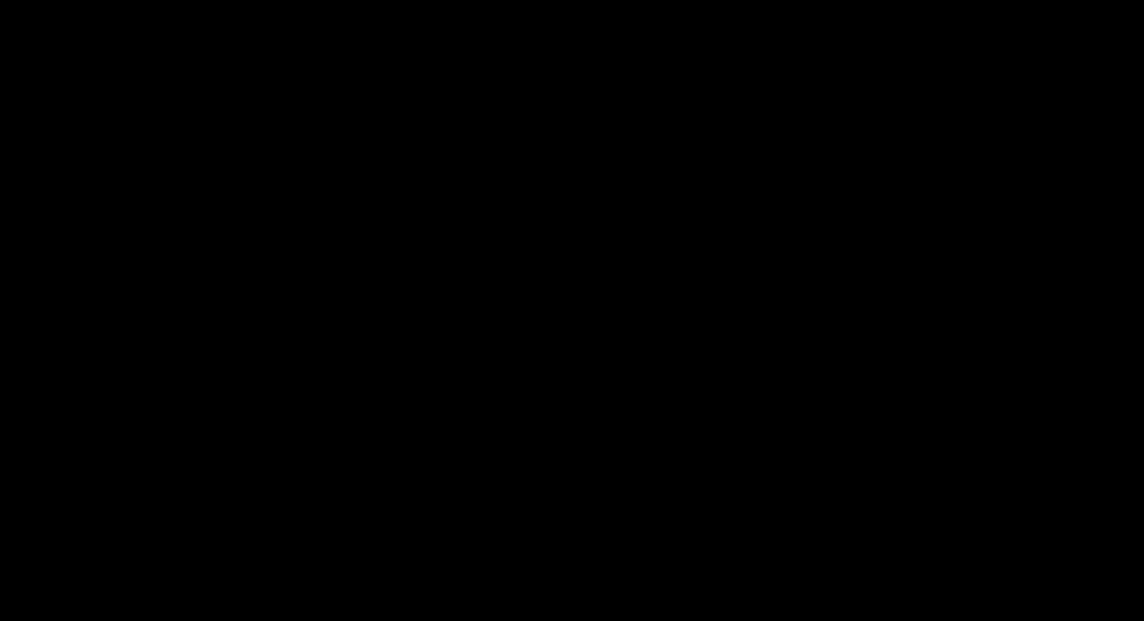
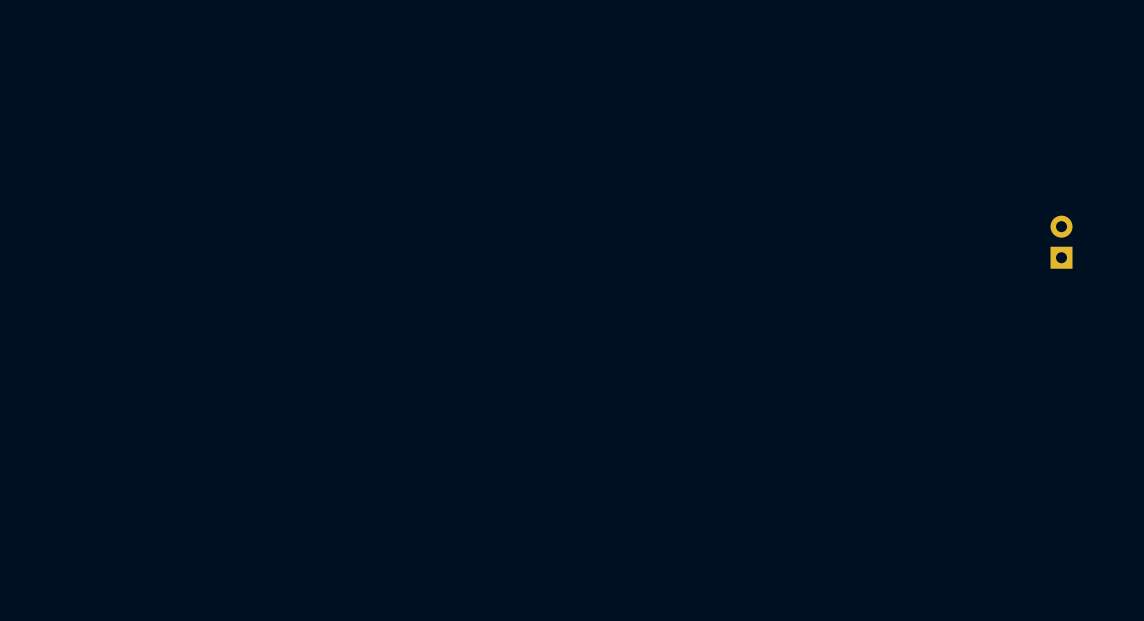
part: none -> (1061, 242)

